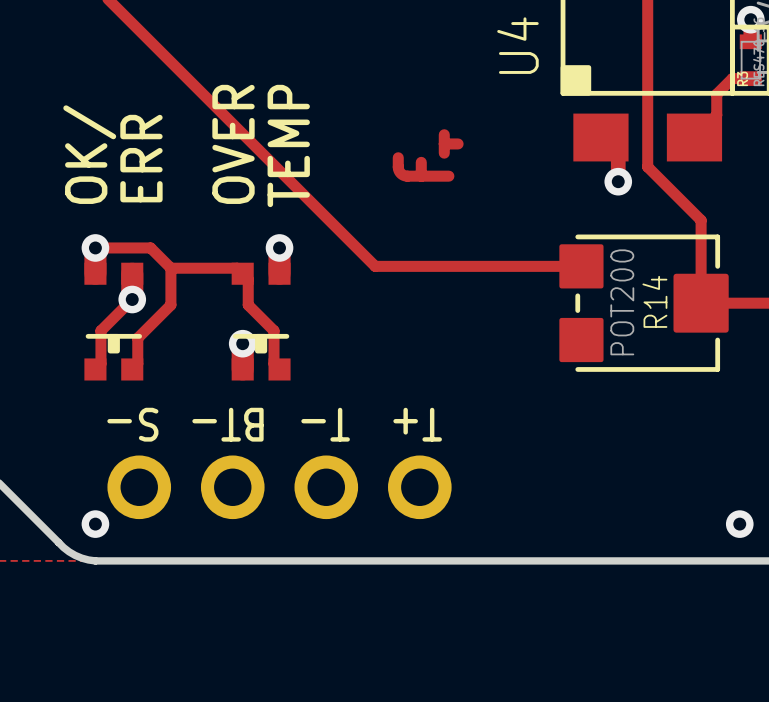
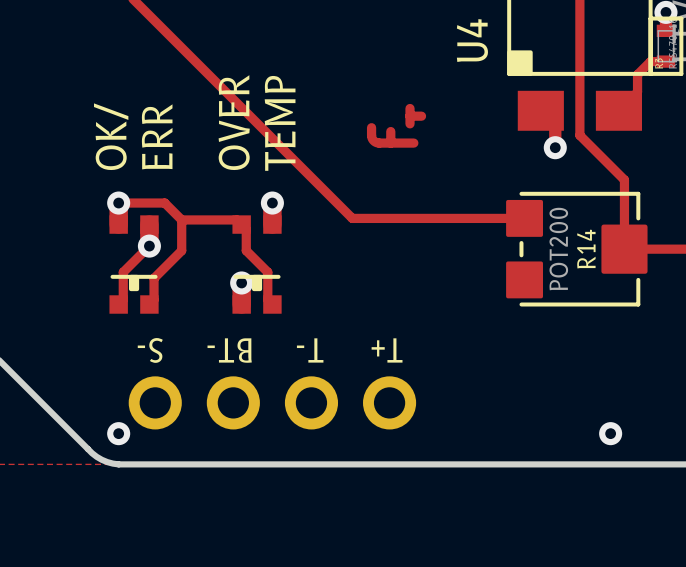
via position: (739, 524) -> (610, 433)

